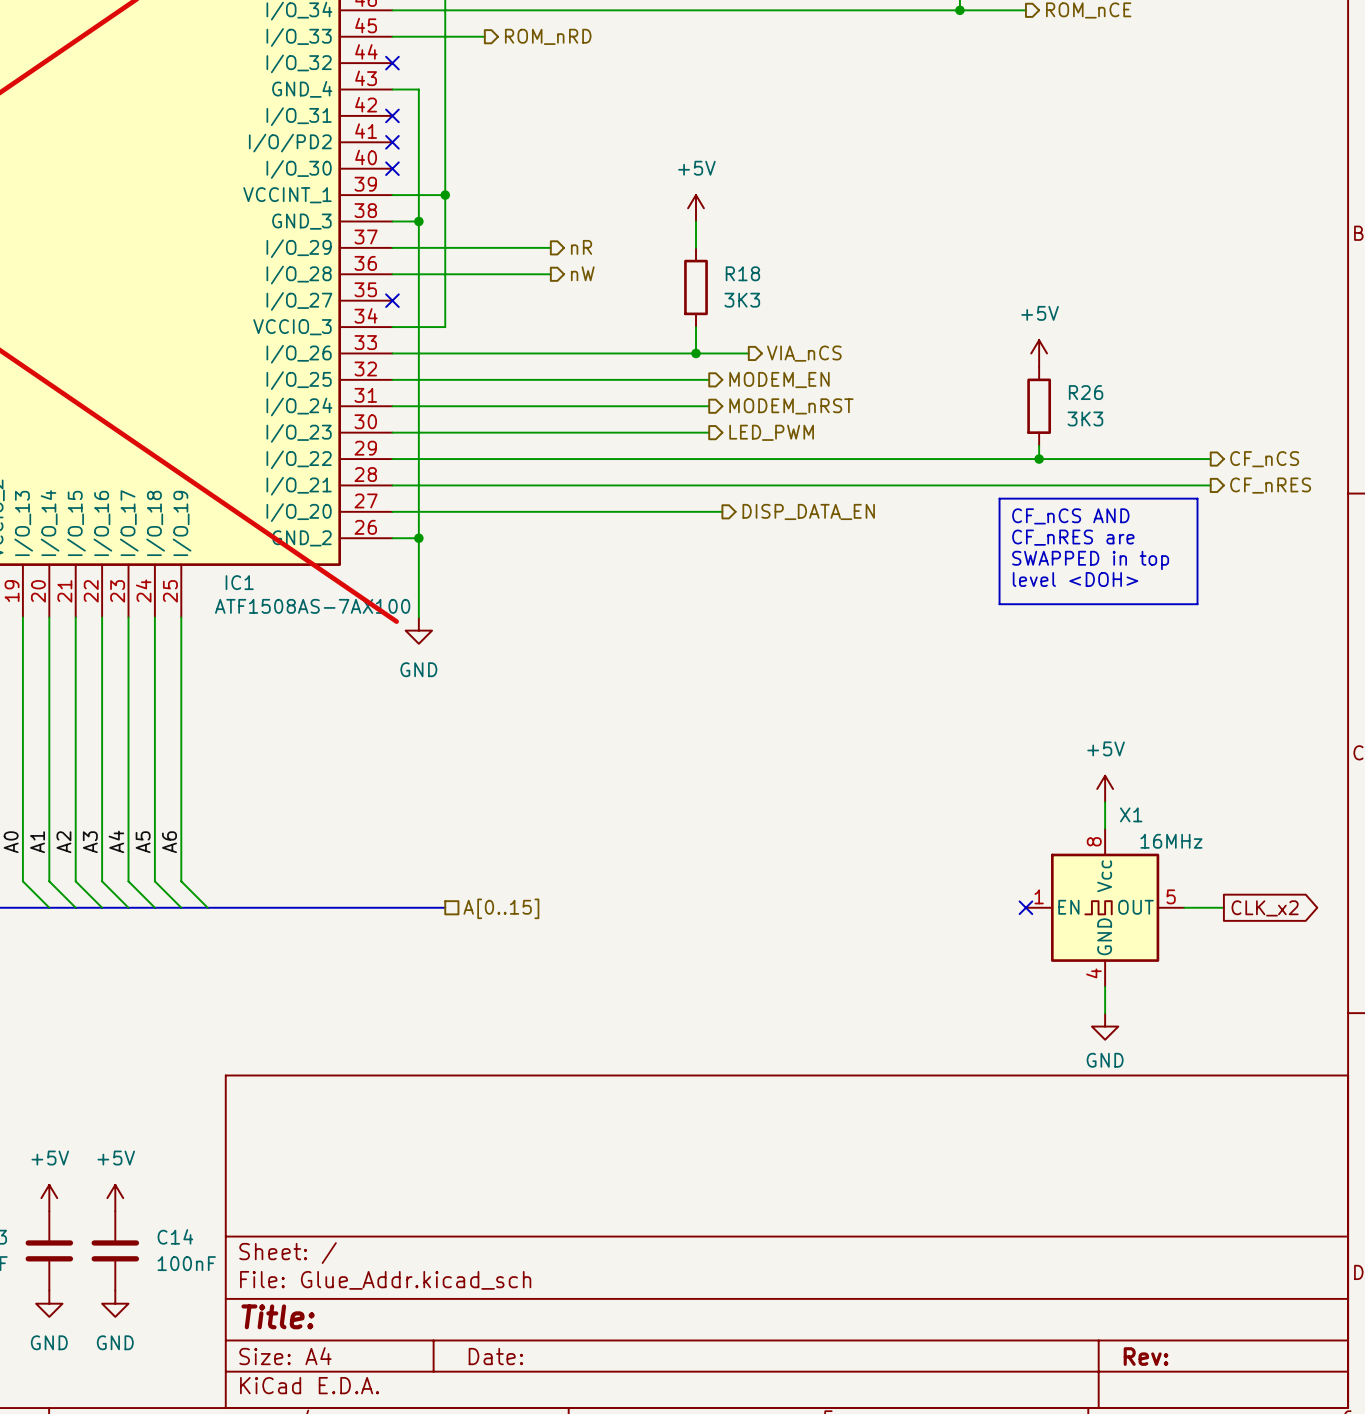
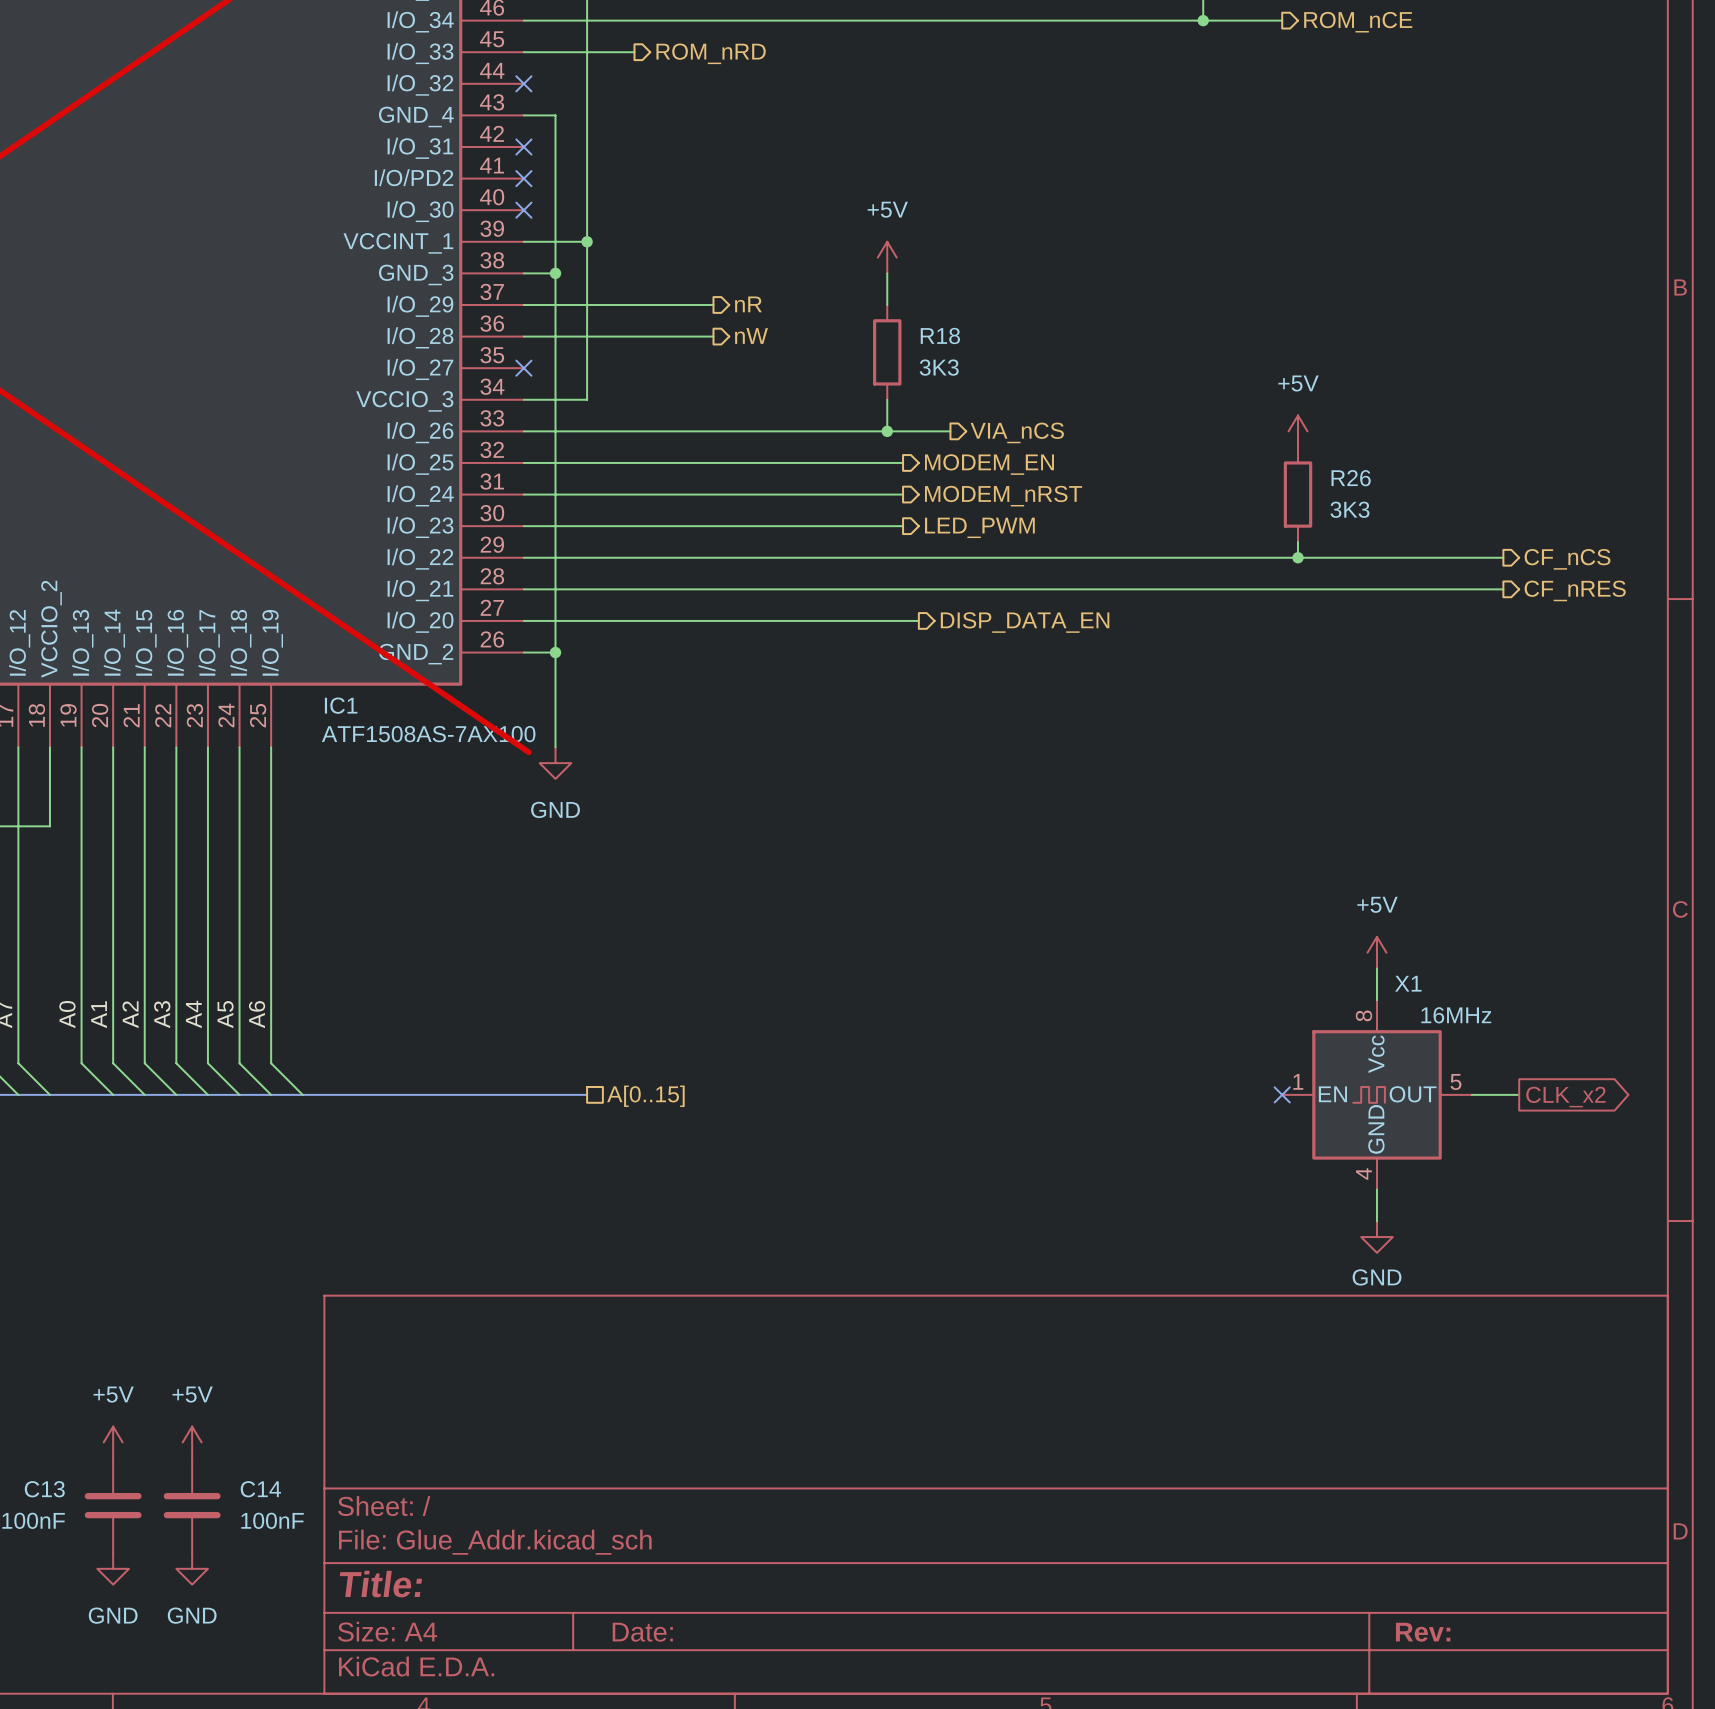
line: (999, 498) (1197, 498) (1197, 604) (999, 604) (999, 498) -> none
text: CF_nCS AND (1070, 516) -> none
text: CF_nRES are (1073, 537) -> none
text: SWAPPED in top (1090, 560) -> none
text: level <DOH> (1075, 579) -> none

